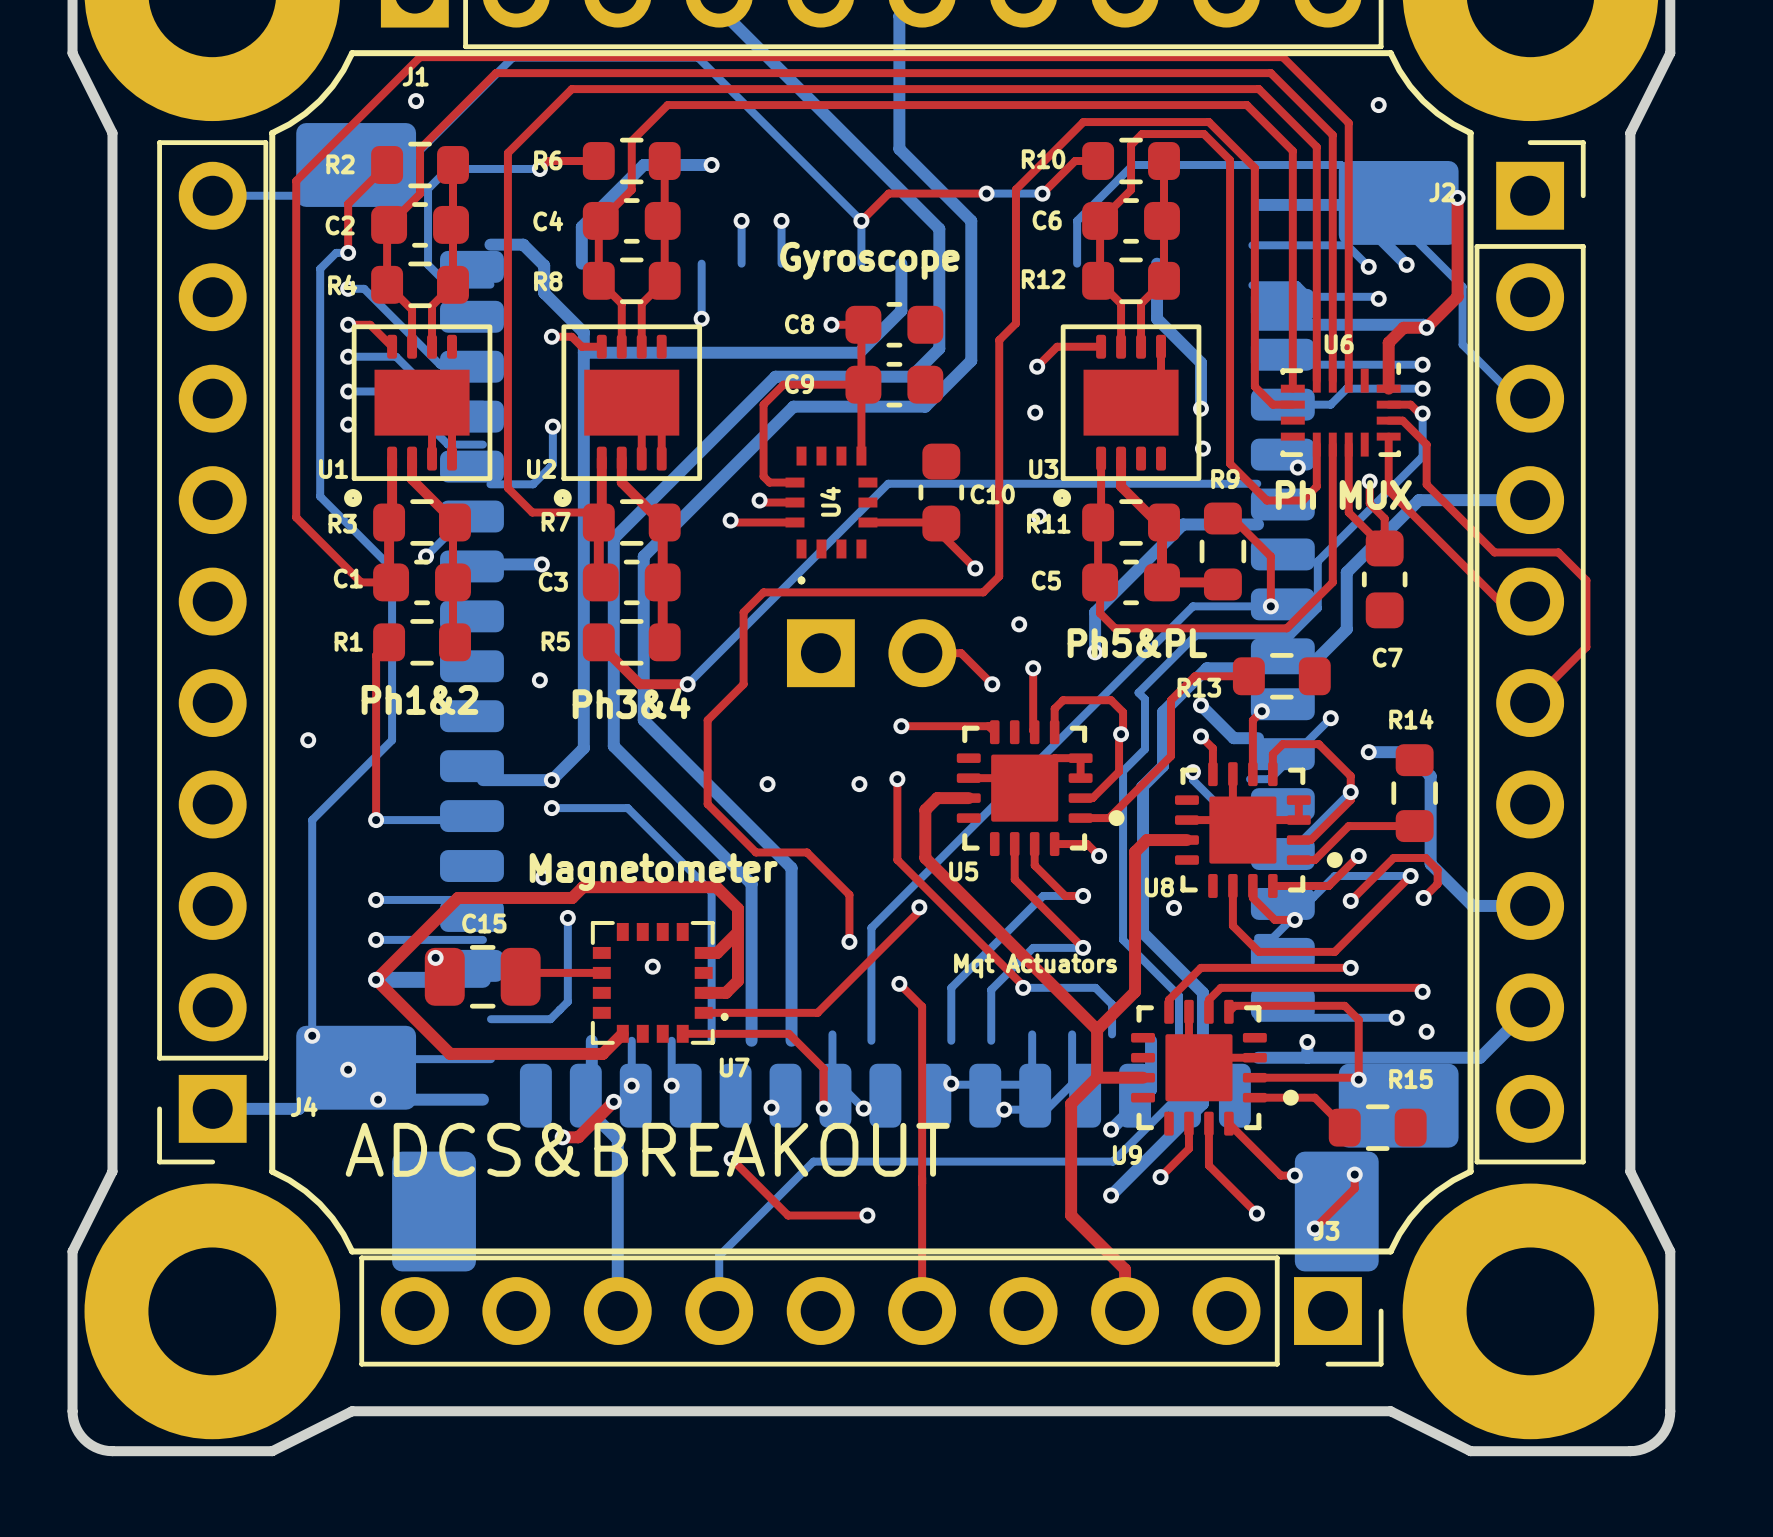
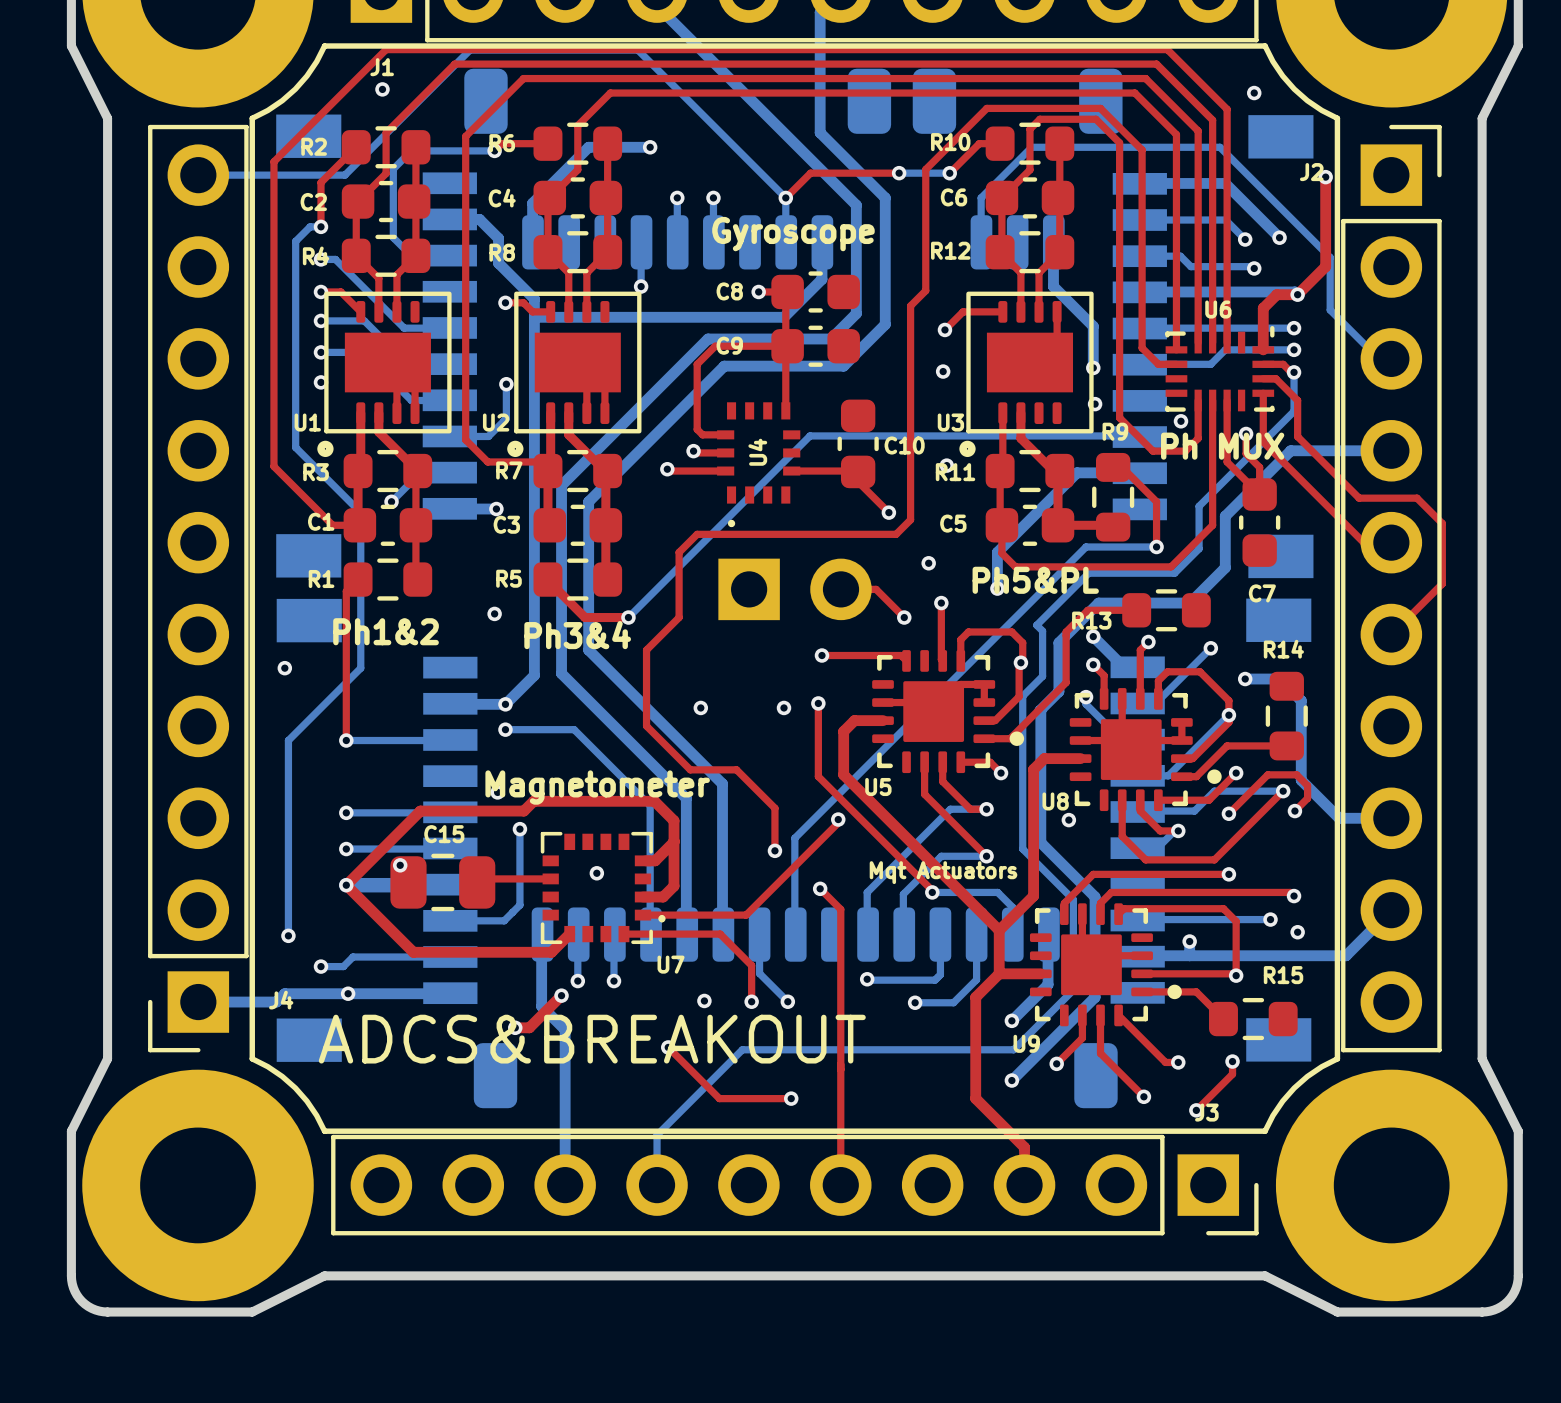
part: none -> (677, 169)
part: none -> (1017, 169)
part: none -> (376, 346)
part: none -> (1213, 346)
part: (400, 616) -> none
part: (1354, 654) -> none
part: none -> (1210, 830)
part: none -> (377, 830)
part: none -> (795, 1007)
part: (885, 1167) -> none

